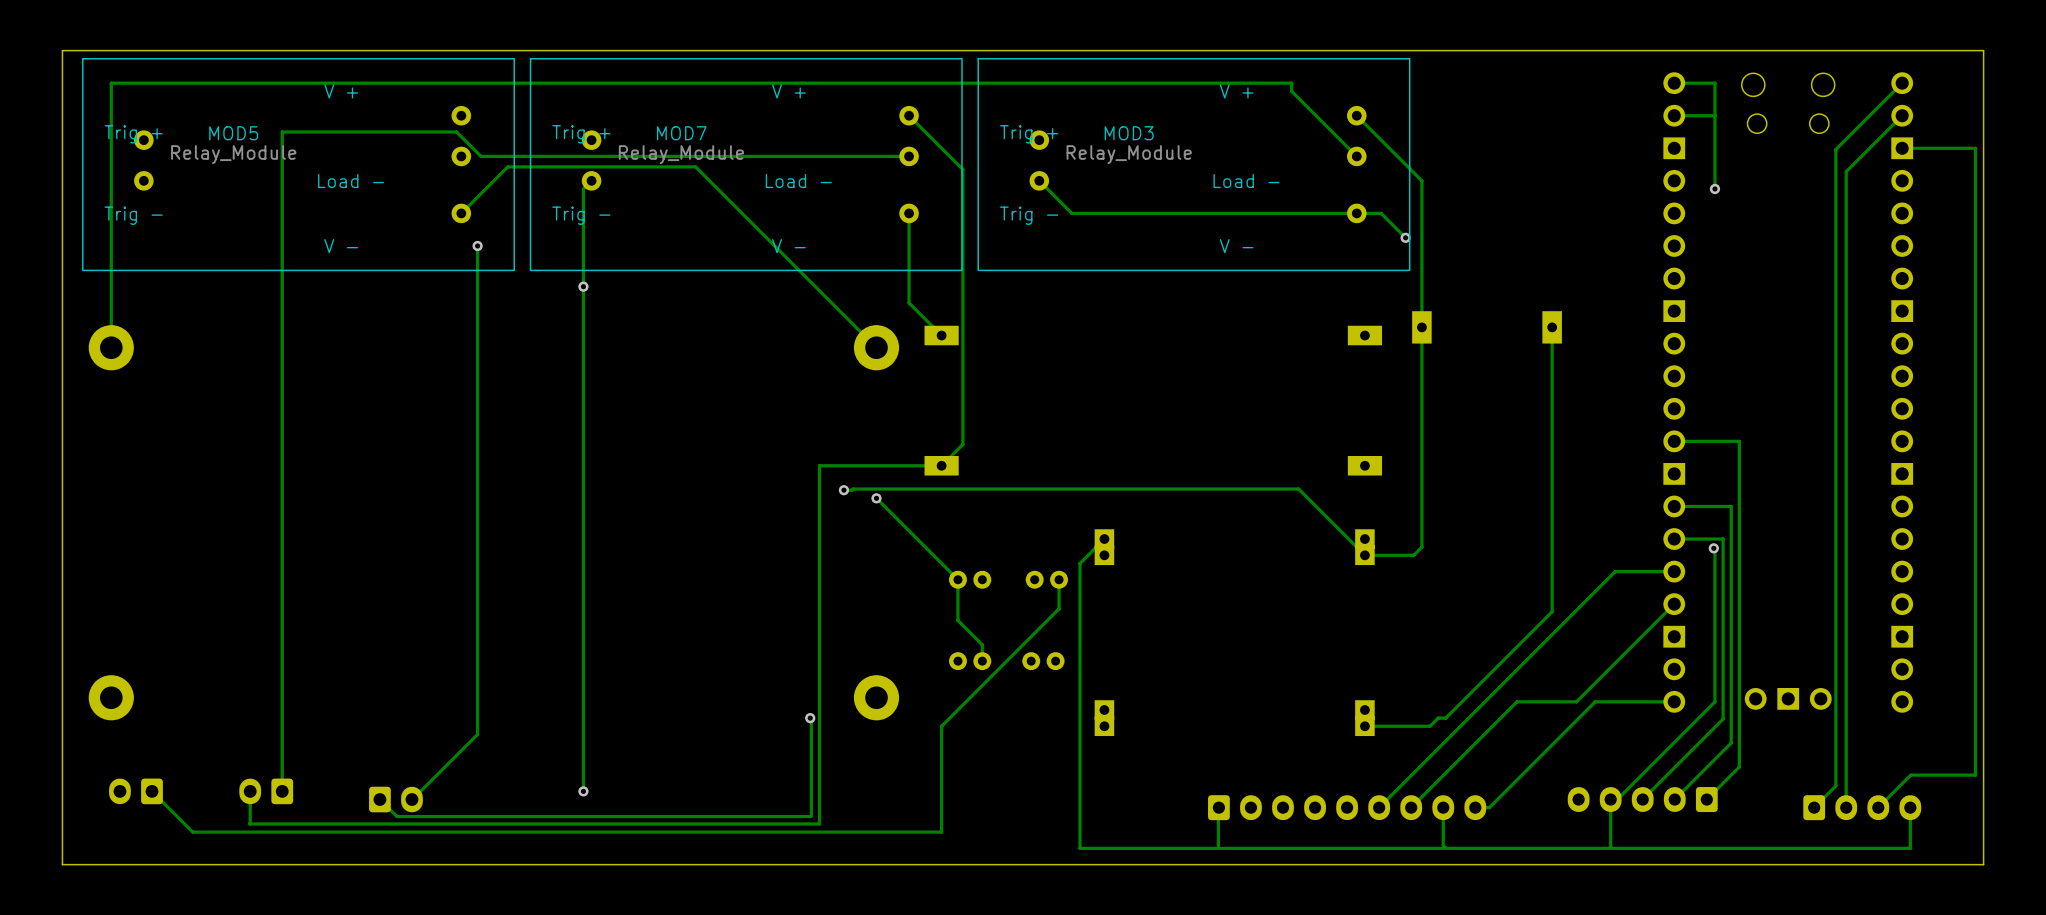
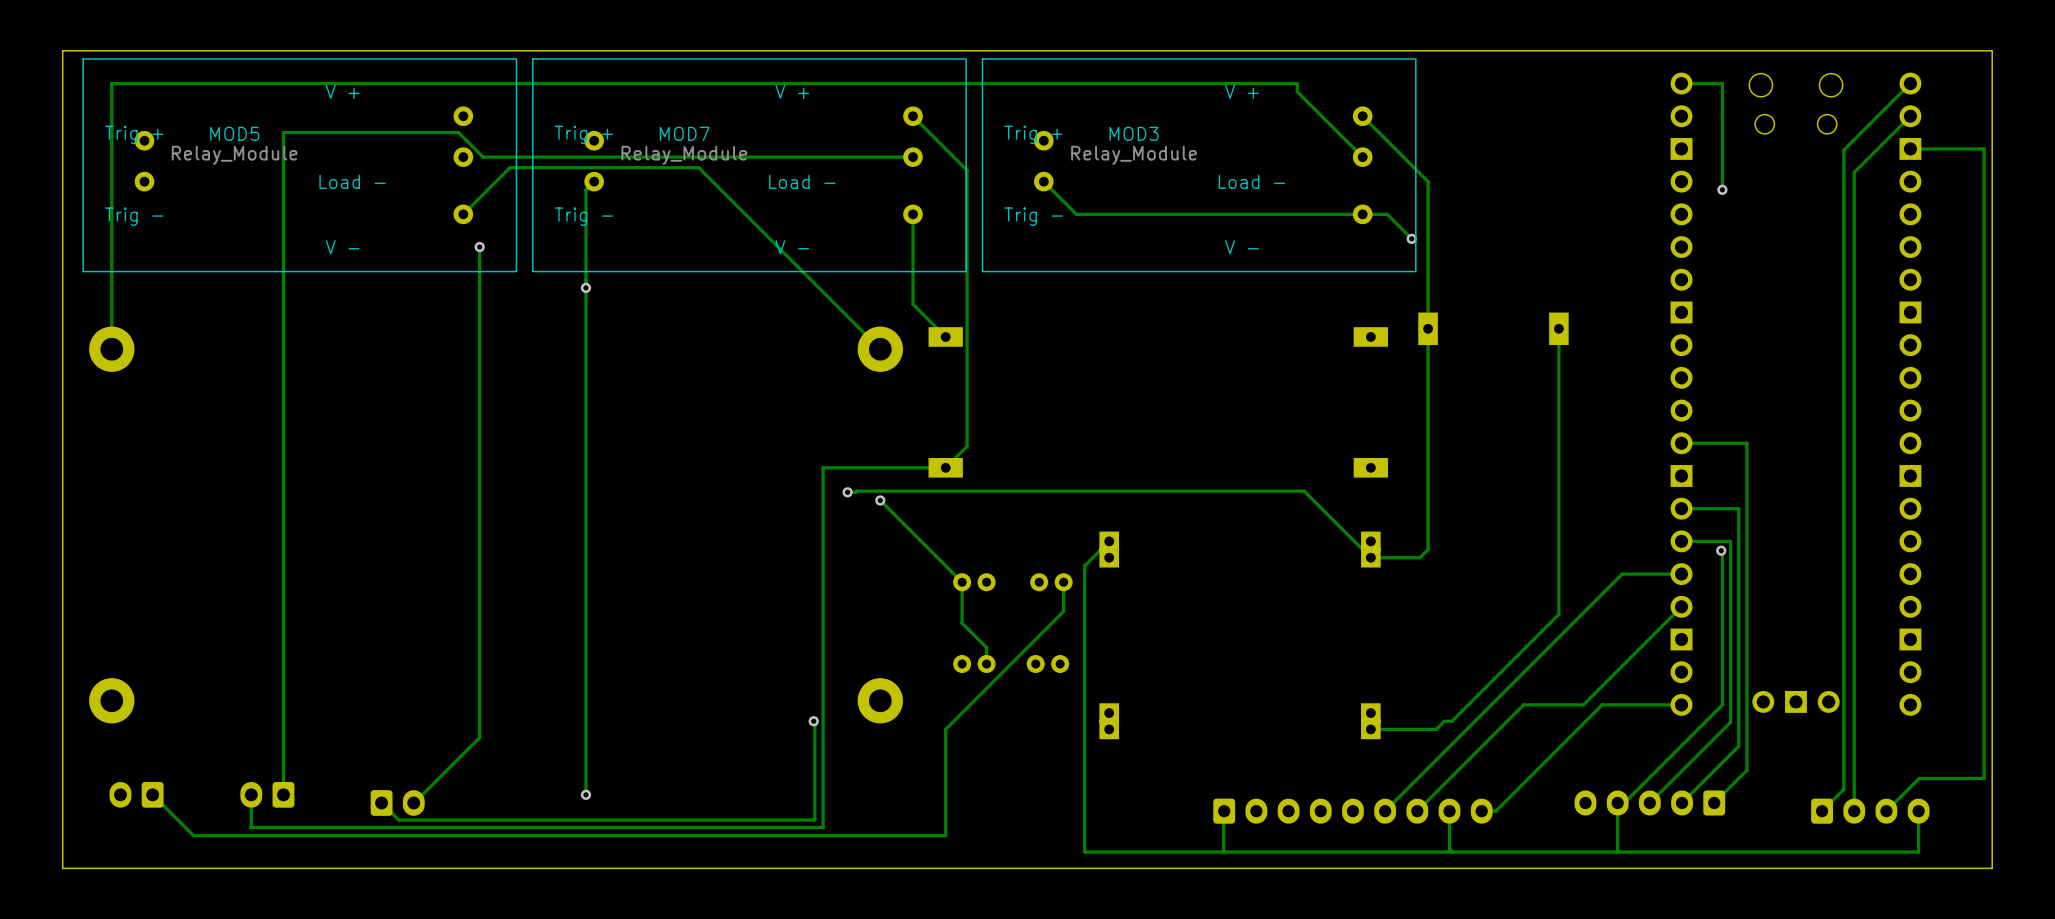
track: (1714, 115) (1674, 115) -> none

